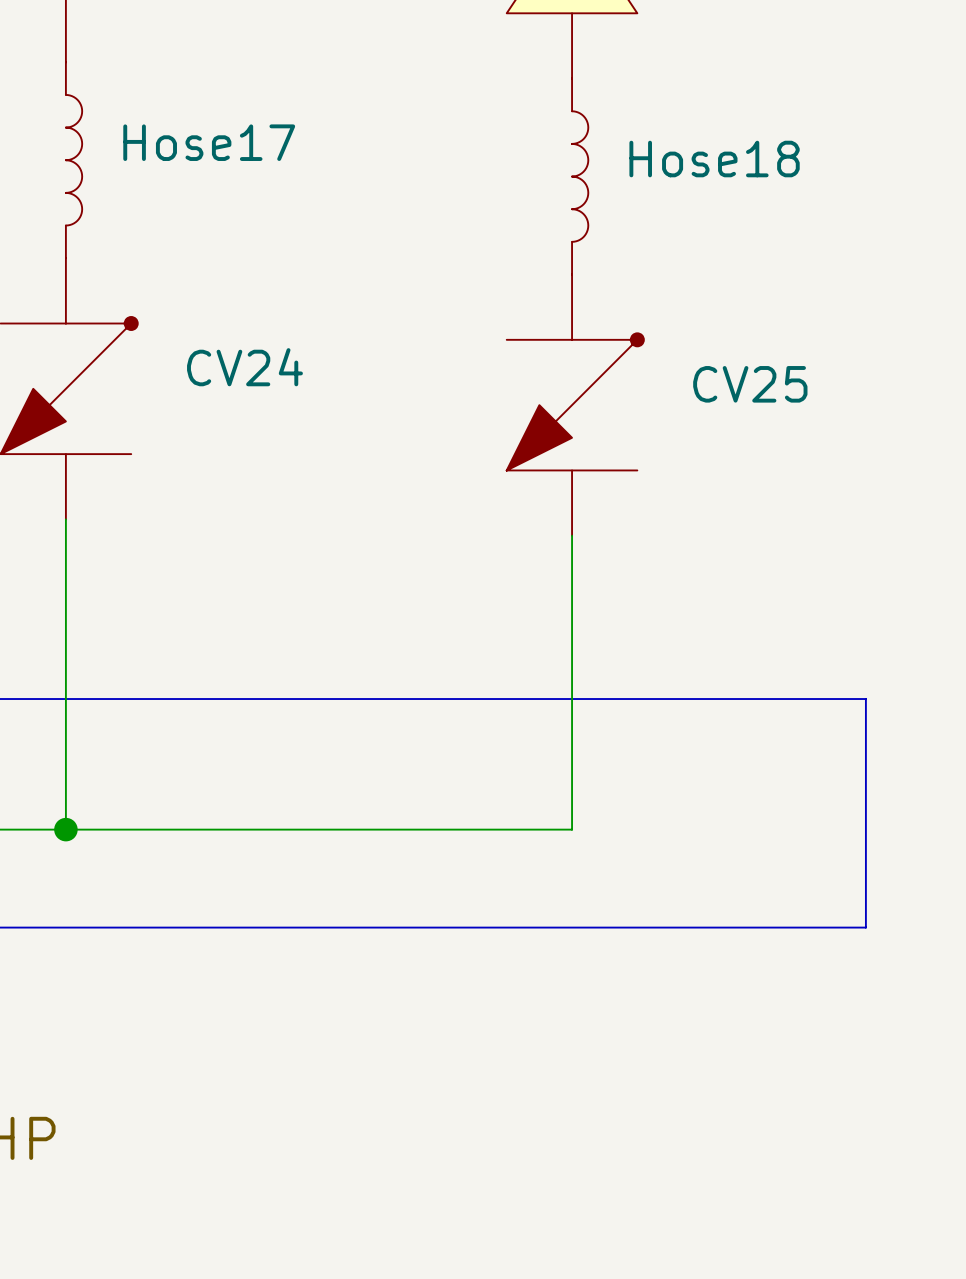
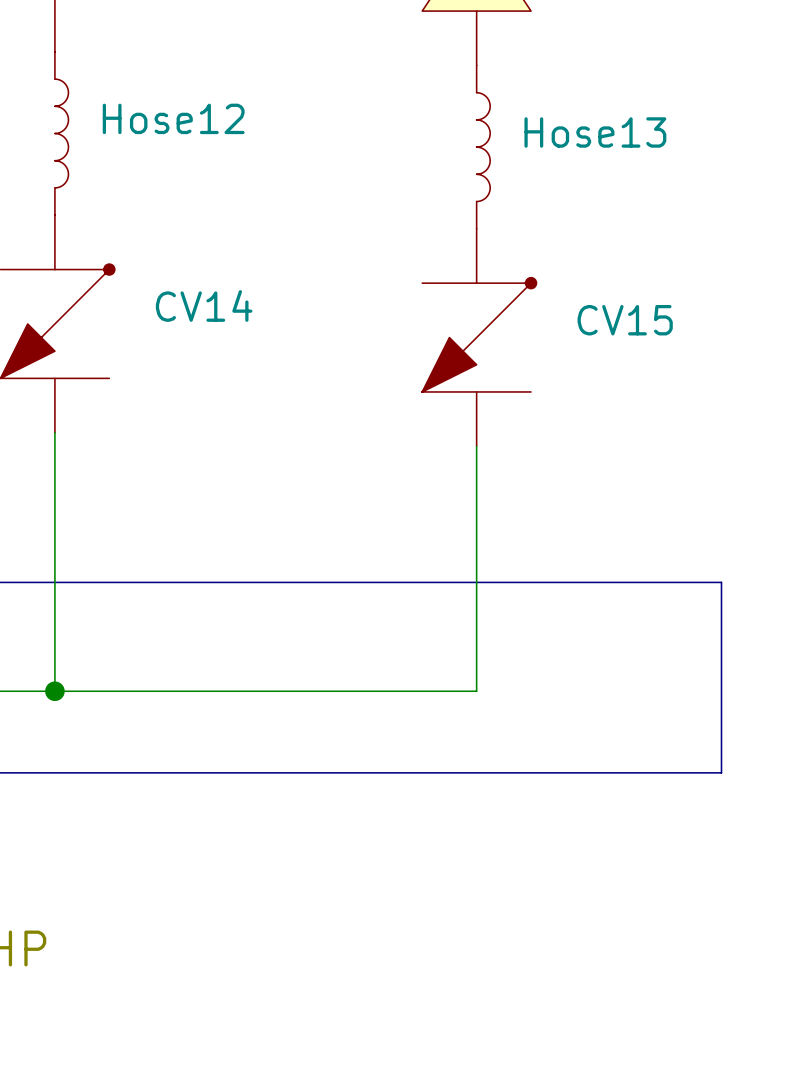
Hose17 name: Hose17 (209, 142) -> Hose12 (173, 118)
Hose18 name: Hose18 (714, 159) -> Hose13 (595, 132)
CV24 name: CV24 (244, 367) -> CV14 (204, 305)
CV25 name: CV25 (750, 384) -> CV15 (625, 320)

